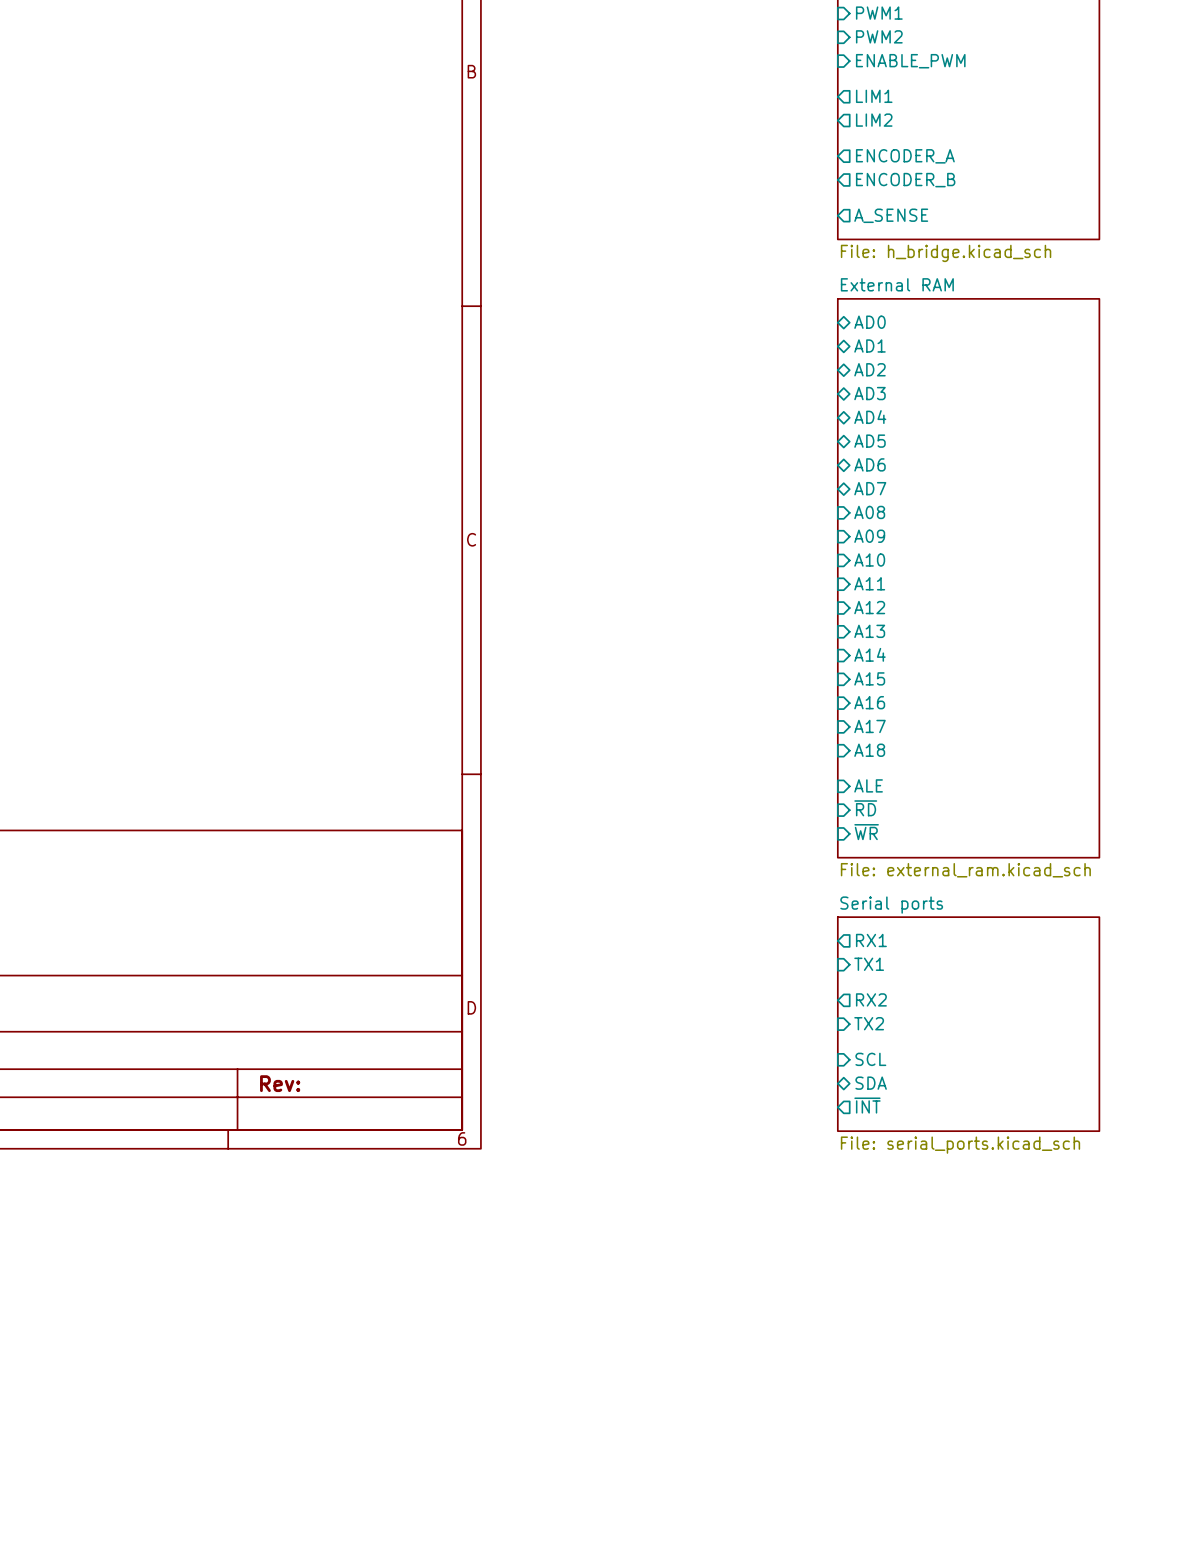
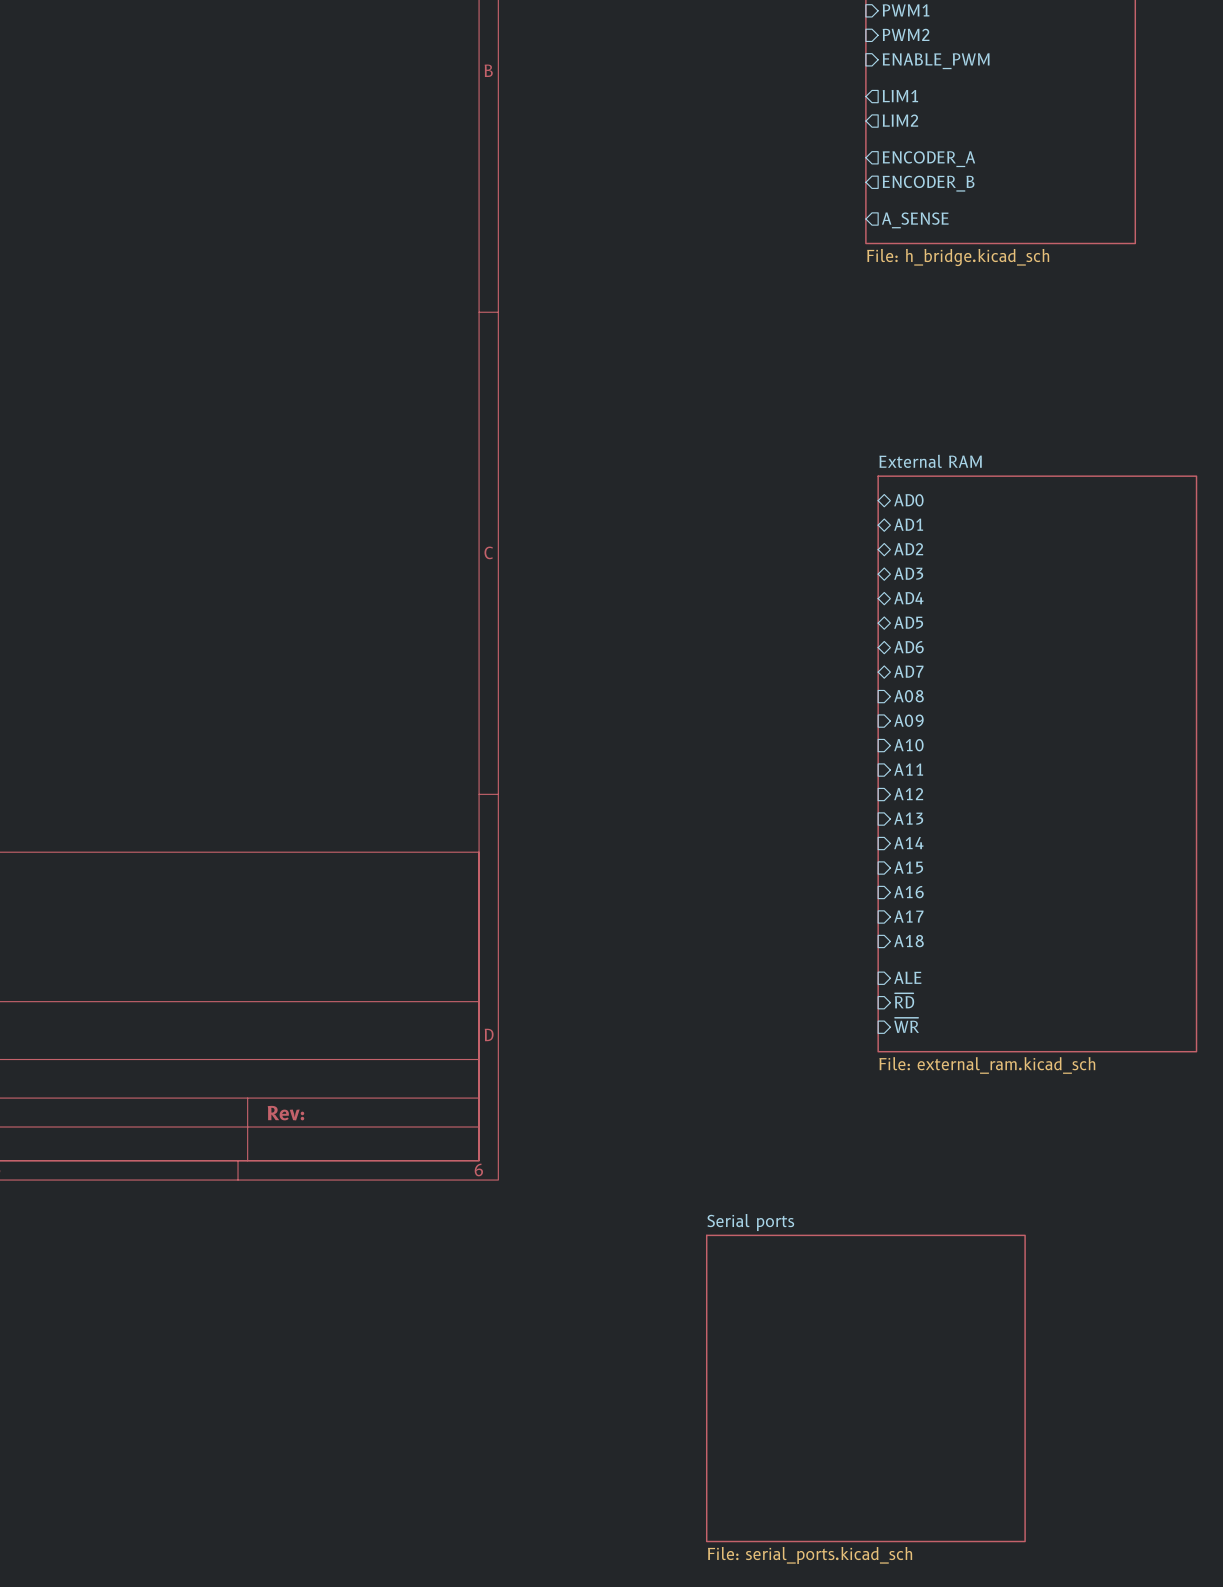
sheet pin position: AD0 (869, 322) -> AD0 (908, 500)
sheet pin position: AD1 (869, 346) -> AD1 (908, 524)
sheet pin position: AD2 (869, 369) -> AD2 (908, 549)
sheet pin position: AD3 (869, 393) -> AD3 (908, 573)
sheet pin position: AD4 (870, 417) -> AD4 (908, 598)
sheet pin position: AD5 (869, 441) -> AD5 (908, 622)
sheet pin position: AD6 (869, 464) -> AD6 (908, 647)
sheet pin position: AD7 (870, 488) -> AD7 (908, 671)
sheet pin position: A08 (869, 512) -> A08 (908, 696)
sheet pin position: A09 (869, 536) -> A09 (908, 720)
sheet pin position: A10 (869, 560) -> A10 (908, 745)
sheet External RAM: File: external_ram.kicad_sch (968, 578) -> none
sheet pin position: A11 (869, 583) -> A11 (908, 769)
sheet pin position: A12 (869, 607) -> A12 (908, 794)
sheet pin position: A13 (869, 631) -> A13 (908, 818)
sheet pin position: A14 (869, 654) -> A14 (908, 843)
sheet pin position: A15 (869, 678) -> A15 (908, 867)
sheet pin position: A16 (869, 702) -> A16 (908, 892)
sheet pin position: A17 (869, 726) -> A17 (908, 916)
sheet External RAM: none -> File: external_ram.kicad_sch (1037, 763)
sheet pin position: A18 (869, 750) -> A18 (908, 941)
sheet pin position: ALE (868, 785) -> ALE (907, 977)
sheet pin position: ~{RD} (865, 808) -> ~{RD} (904, 1000)
sheet pin position: ~{WR} (866, 832) -> ~{WR} (906, 1025)
sheet pin: RX1 (871, 940) -> none
sheet pin: TX1 (869, 964) -> none
sheet pin: RX2 (871, 999) -> none
sheet pin: TX2 (869, 1023) -> none
sheet Serial ports: File: serial_ports.kicad_sch (968, 1024) -> none
sheet pin: SCL (870, 1059) -> none
sheet pin: SDA (871, 1083) -> none
sheet pin: ~{INT} (867, 1105) -> none
sheet Serial ports: none -> File: serial_ports.kicad_sch (865, 1388)

